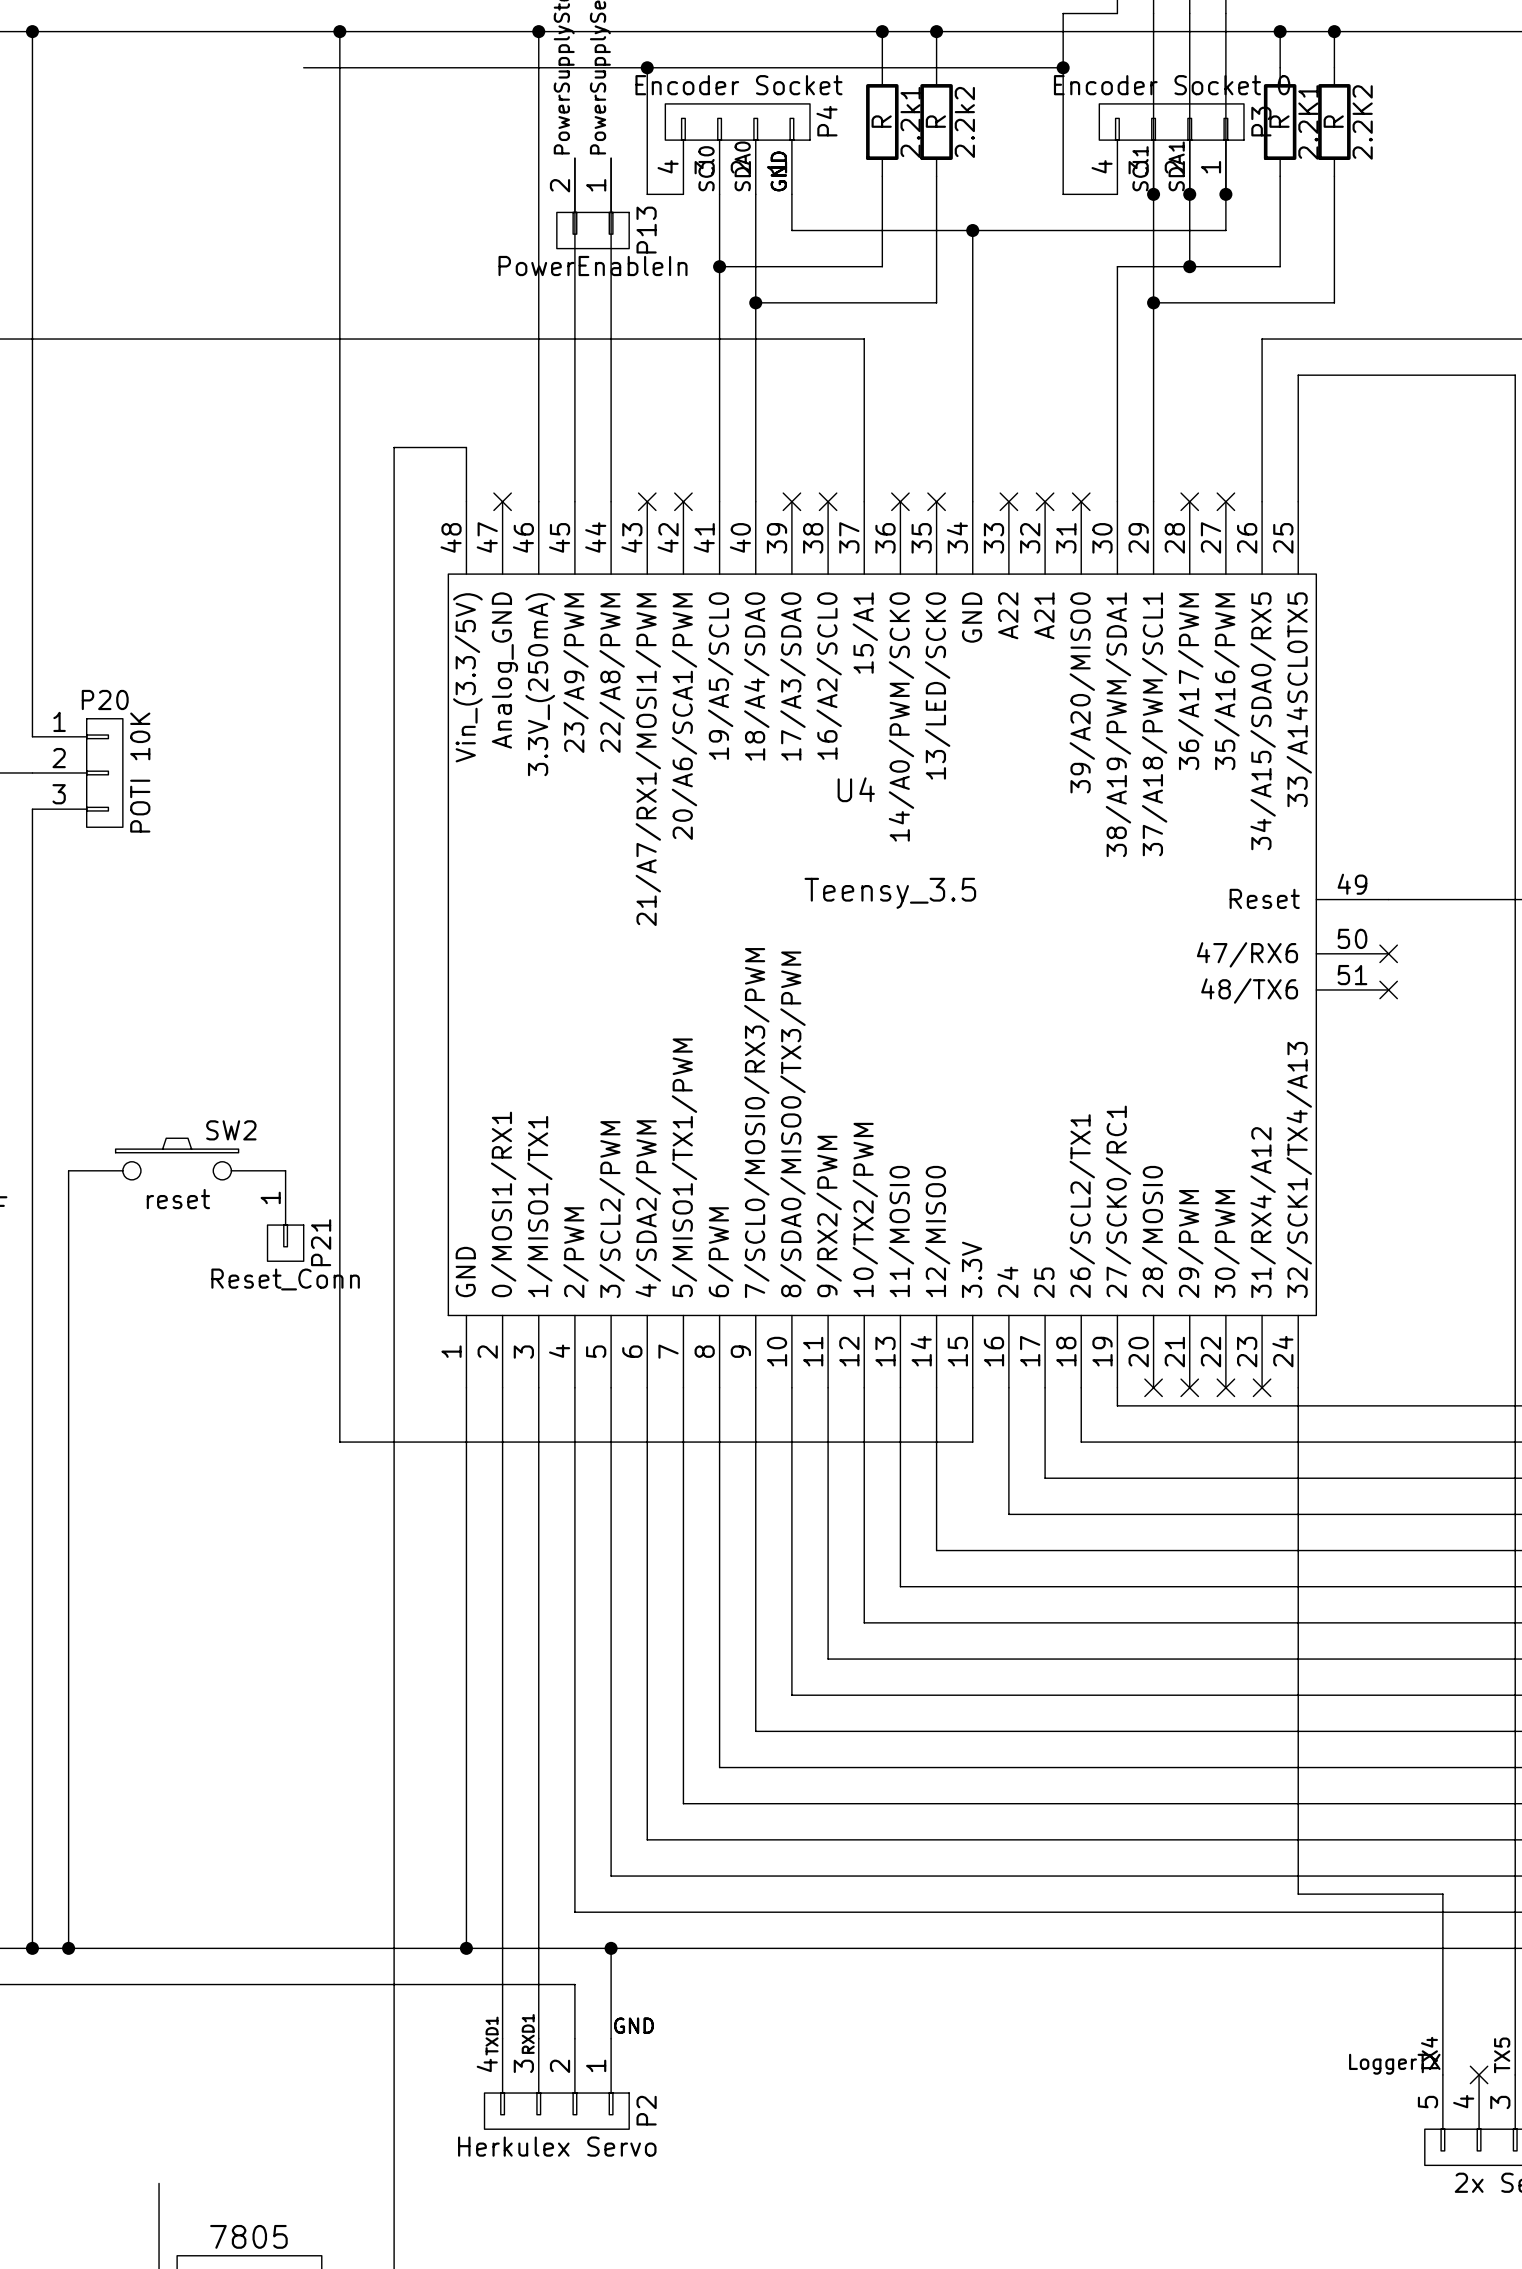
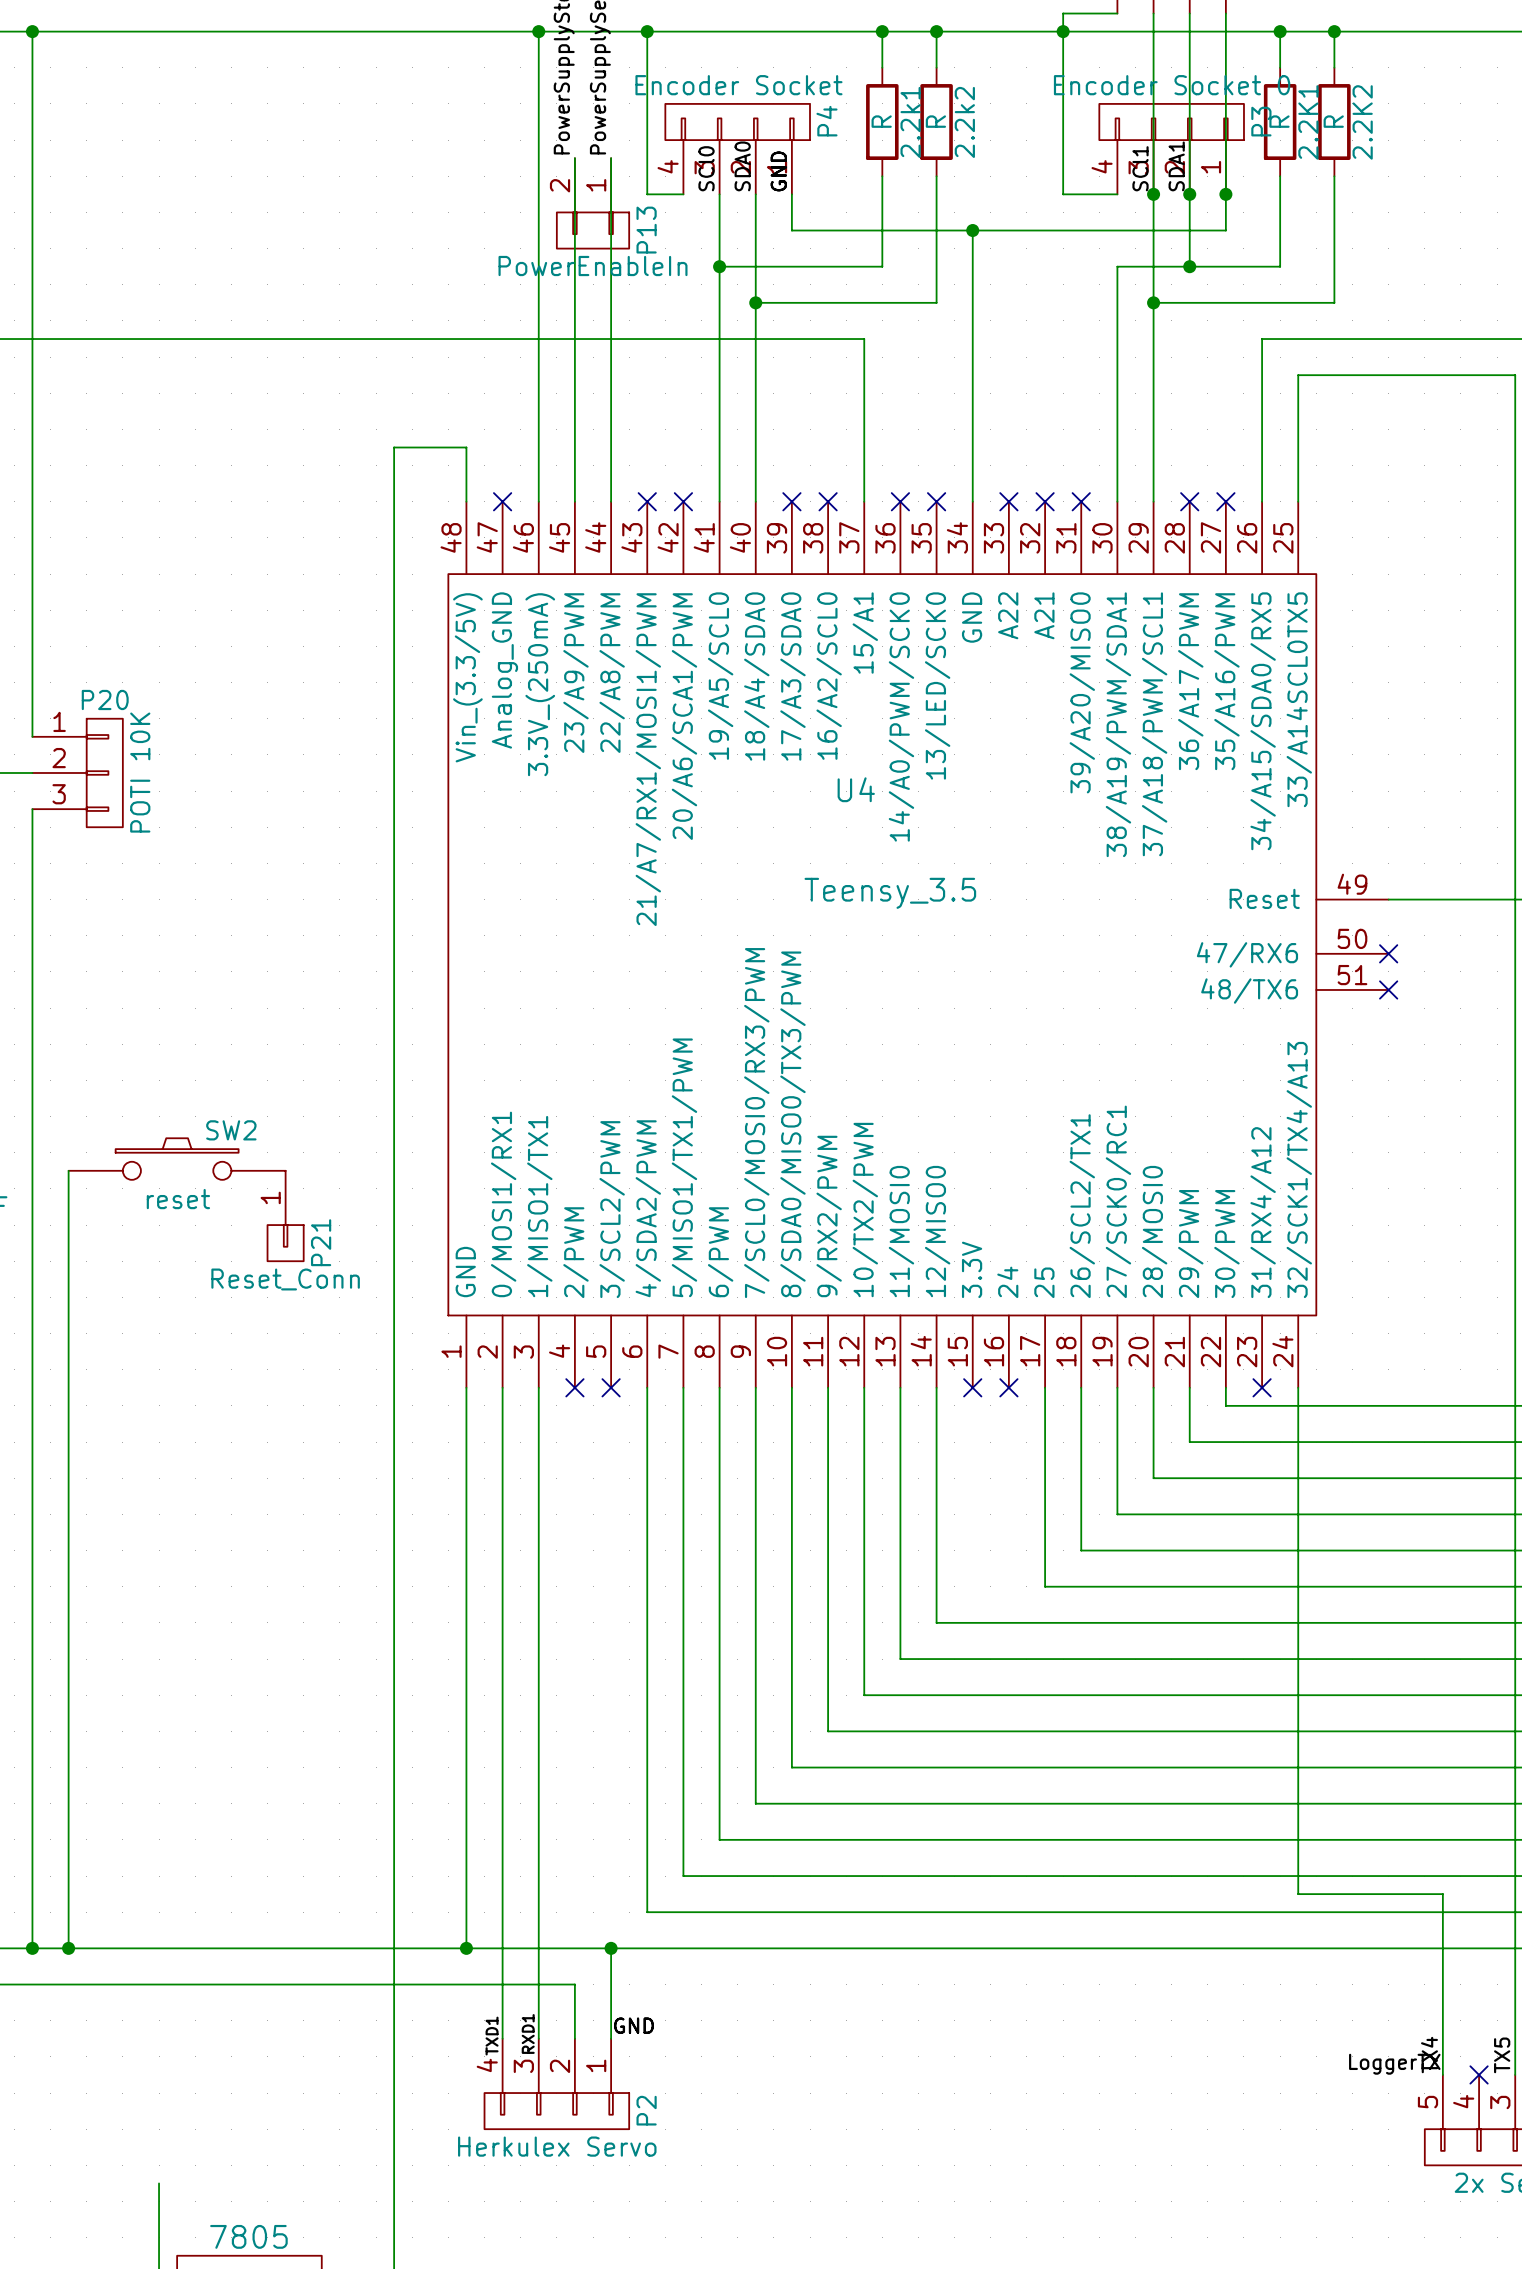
wire: (339, 31) (339, 1442) (972, 1442) (972, 1387) -> none
junction: (339, 31) -> none
wire: none -> (647, 31) (647, 67)
wire: (303, 67) (1063, 67) -> none
junction position: (647, 67) -> (647, 31)
junction position: (1063, 67) -> (1063, 31)
wire: (574, 1387) (574, 1912) (647, 1912) -> none
no-connect mark: none -> (574, 1387)
wire: (611, 1387) (611, 1876) (683, 1876) -> none
no-connect mark: none -> (611, 1387)
no-connect mark: none -> (972, 1387)
wire: (1008, 1387) (1008, 1514) (1117, 1514) -> (1117, 1405) (1117, 1514)
no-connect mark: none -> (1008, 1387)
no-connect mark: (1153, 1387) -> none
no-connect mark: (1189, 1387) -> none
no-connect mark: (1225, 1387) -> none
wire: (1117, 1405) (1225, 1405) -> (1225, 1387) (1225, 1405)
wire: (1081, 1442) (1189, 1442) -> (1189, 1387) (1189, 1442)
wire: none -> (1081, 1442) (1081, 1550)
wire: (1045, 1478) (1153, 1478) -> (1153, 1387) (1153, 1478)
wire: (936, 1550) (1081, 1550) -> (936, 1550) (936, 1622)
wire: (900, 1586) (1045, 1586) -> (1045, 1478) (1045, 1586)
wire: (864, 1622) (936, 1622) -> (864, 1622) (864, 1695)
wire: (828, 1659) (900, 1659) -> (900, 1586) (900, 1659)
wire: none -> (828, 1659) (828, 1731)
wire: (791, 1695) (864, 1695) -> (791, 1695) (791, 1767)
wire: (755, 1731) (828, 1731) -> (755, 1731) (755, 1803)
wire: (719, 1767) (791, 1767) -> (719, 1767) (719, 1839)
wire: (683, 1803) (755, 1803) -> (683, 1803) (683, 1876)
wire: (647, 1839) (719, 1839) -> (647, 1839) (647, 1912)

